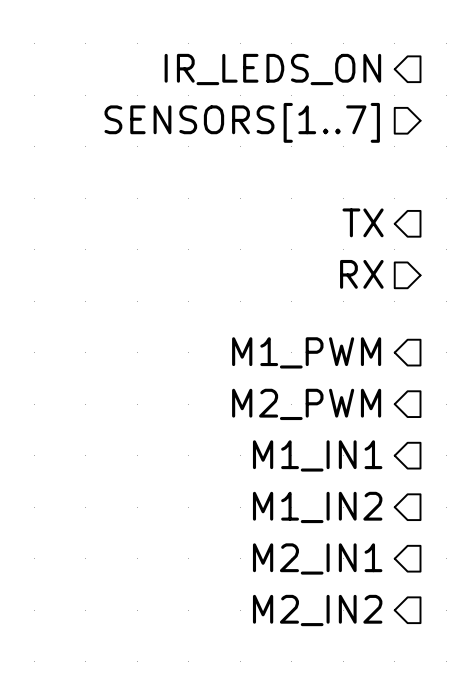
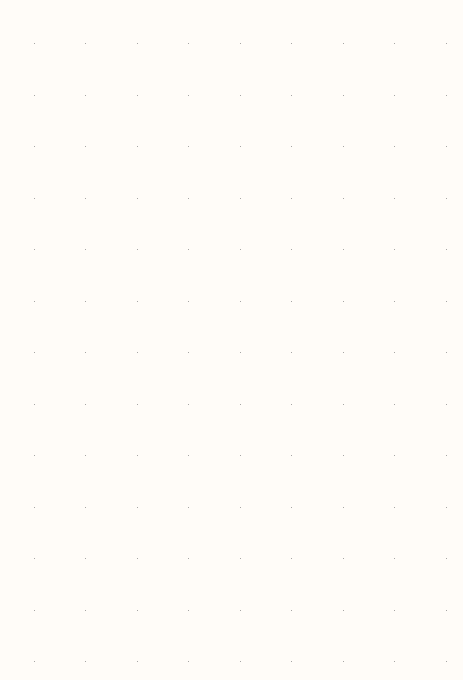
hierarchical label: IR_LEDS_ON (272, 69) -> none
hierarchical label: SENSORS[1..7] (242, 122) -> none
hierarchical label: TX (363, 222) -> none
hierarchical label: RX (361, 274) -> none
hierarchical label: M1_PWM (306, 352) -> none
hierarchical label: M2_PWM (306, 404) -> none
hierarchical label: M1_IN1 (317, 455) -> none
hierarchical label: M1_IN2 (317, 507) -> none
hierarchical label: M2_IN1 (317, 558) -> none
hierarchical label: M2_IN2 (317, 610) -> none

